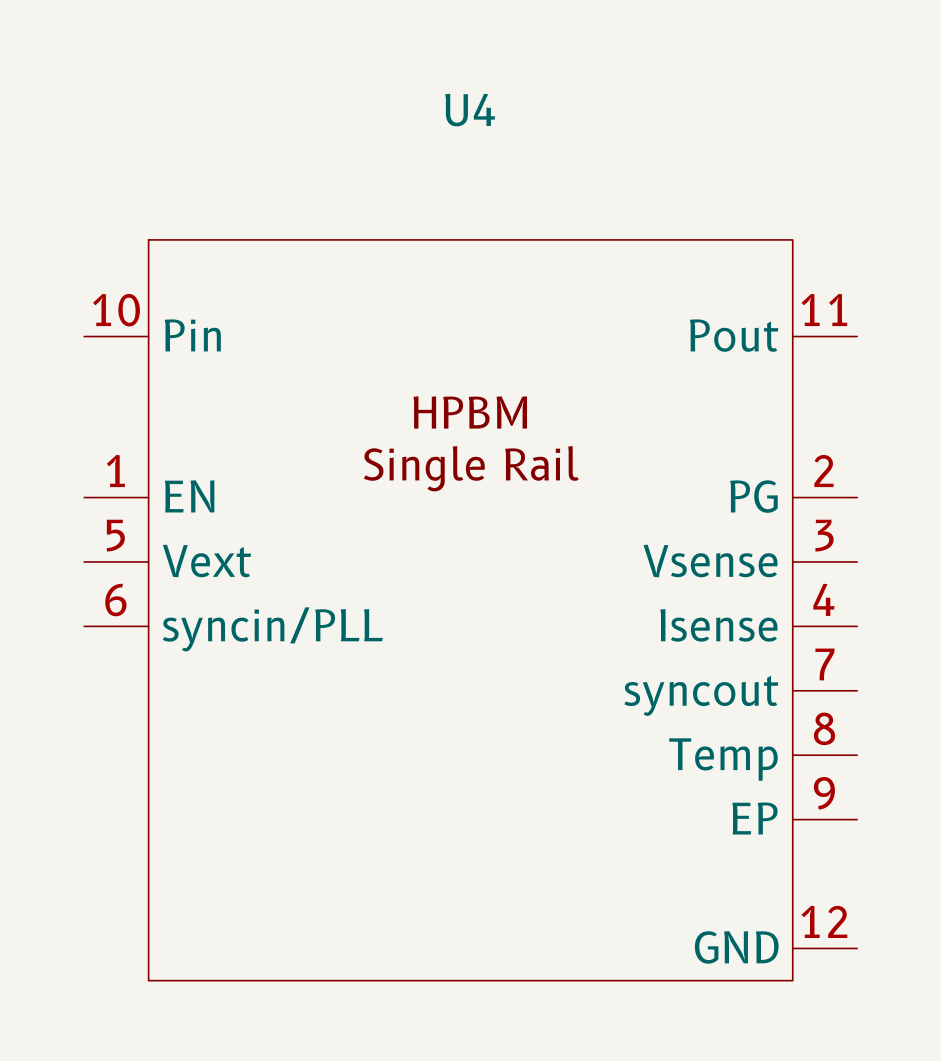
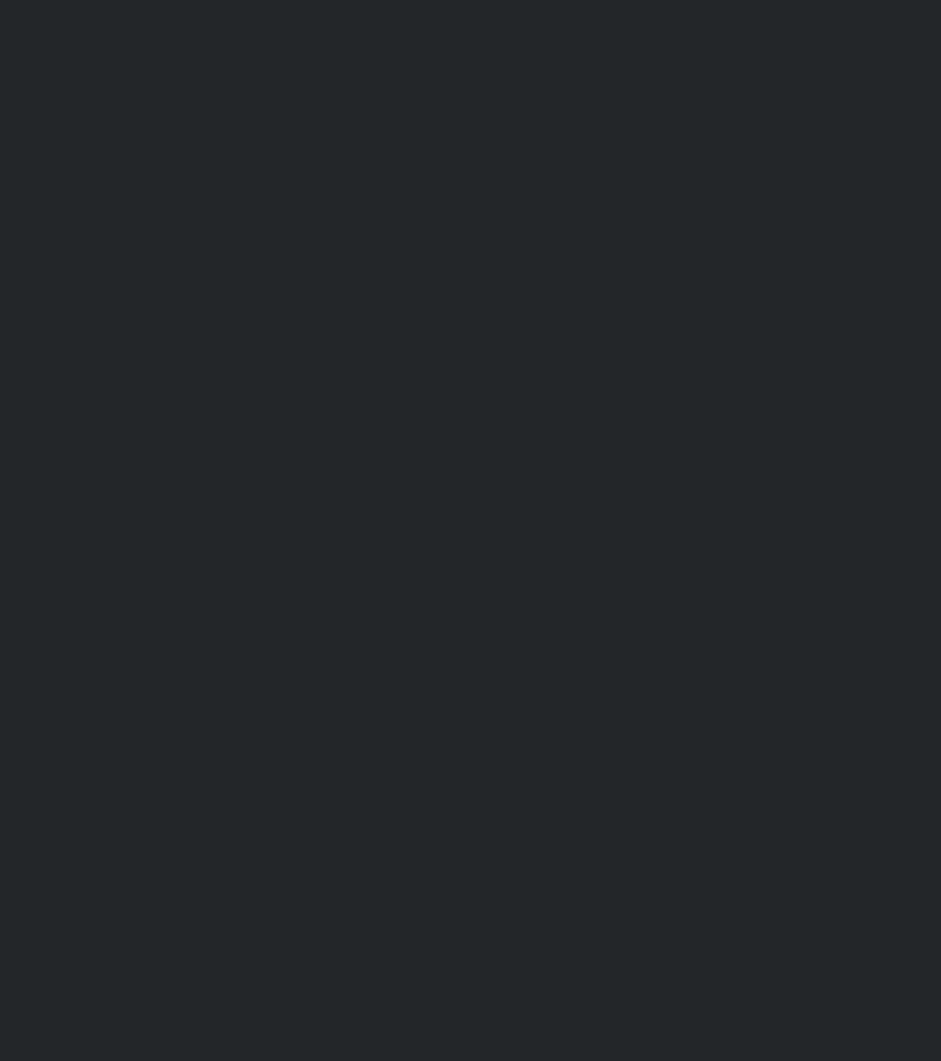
U4: (470, 610) -> none

